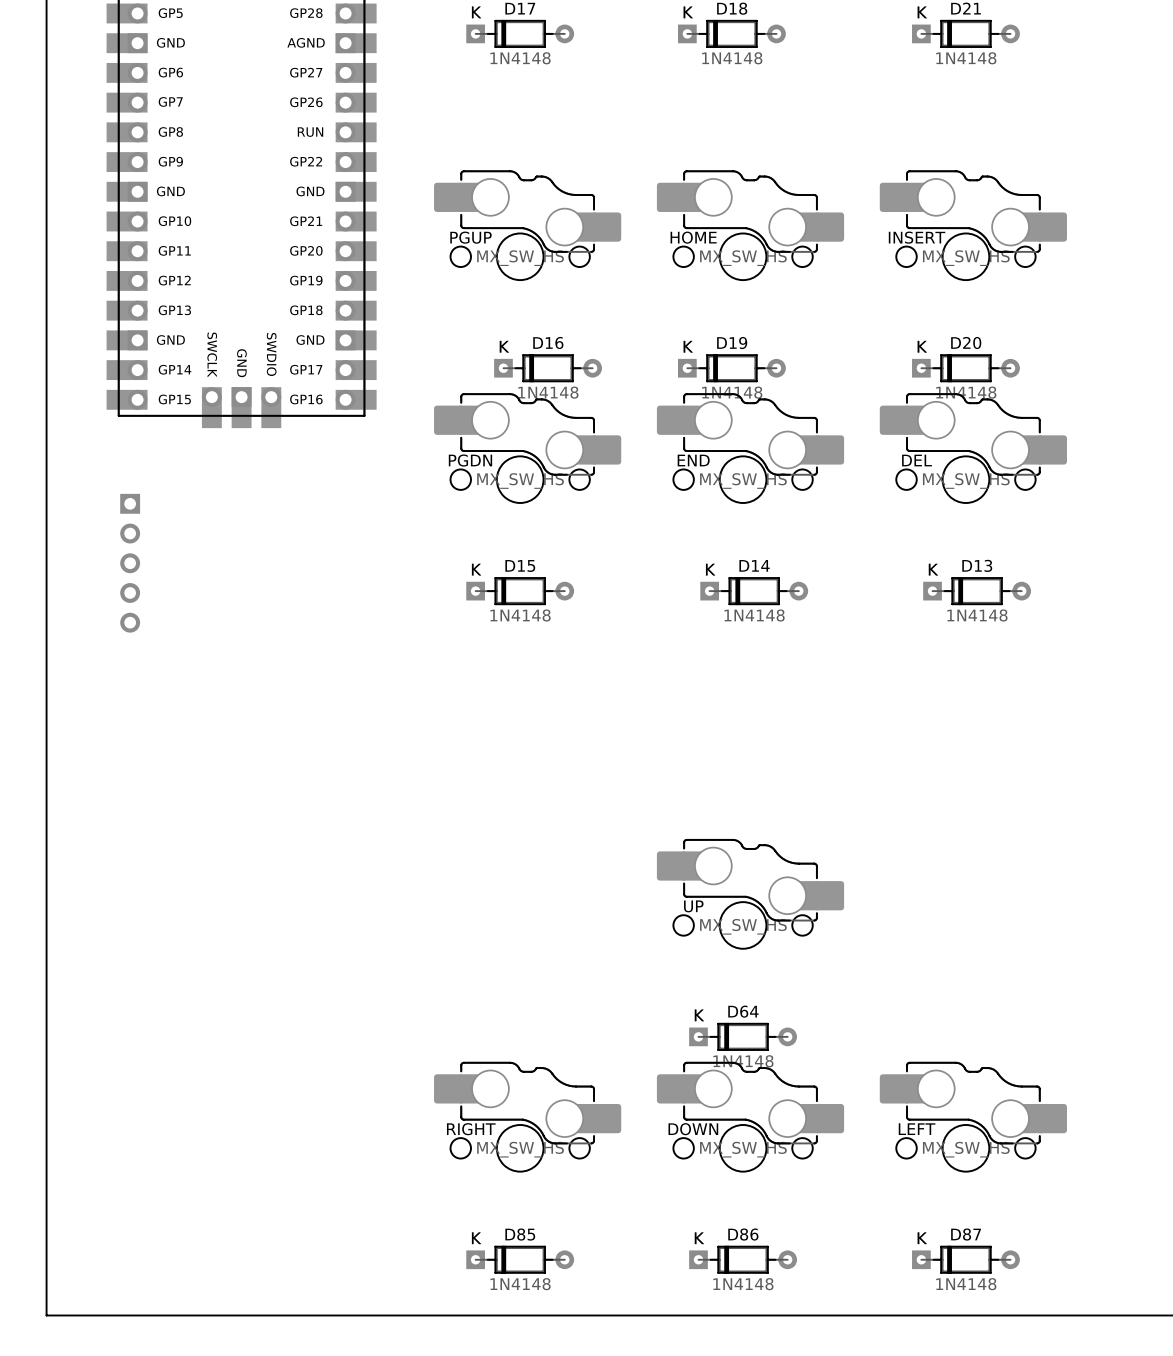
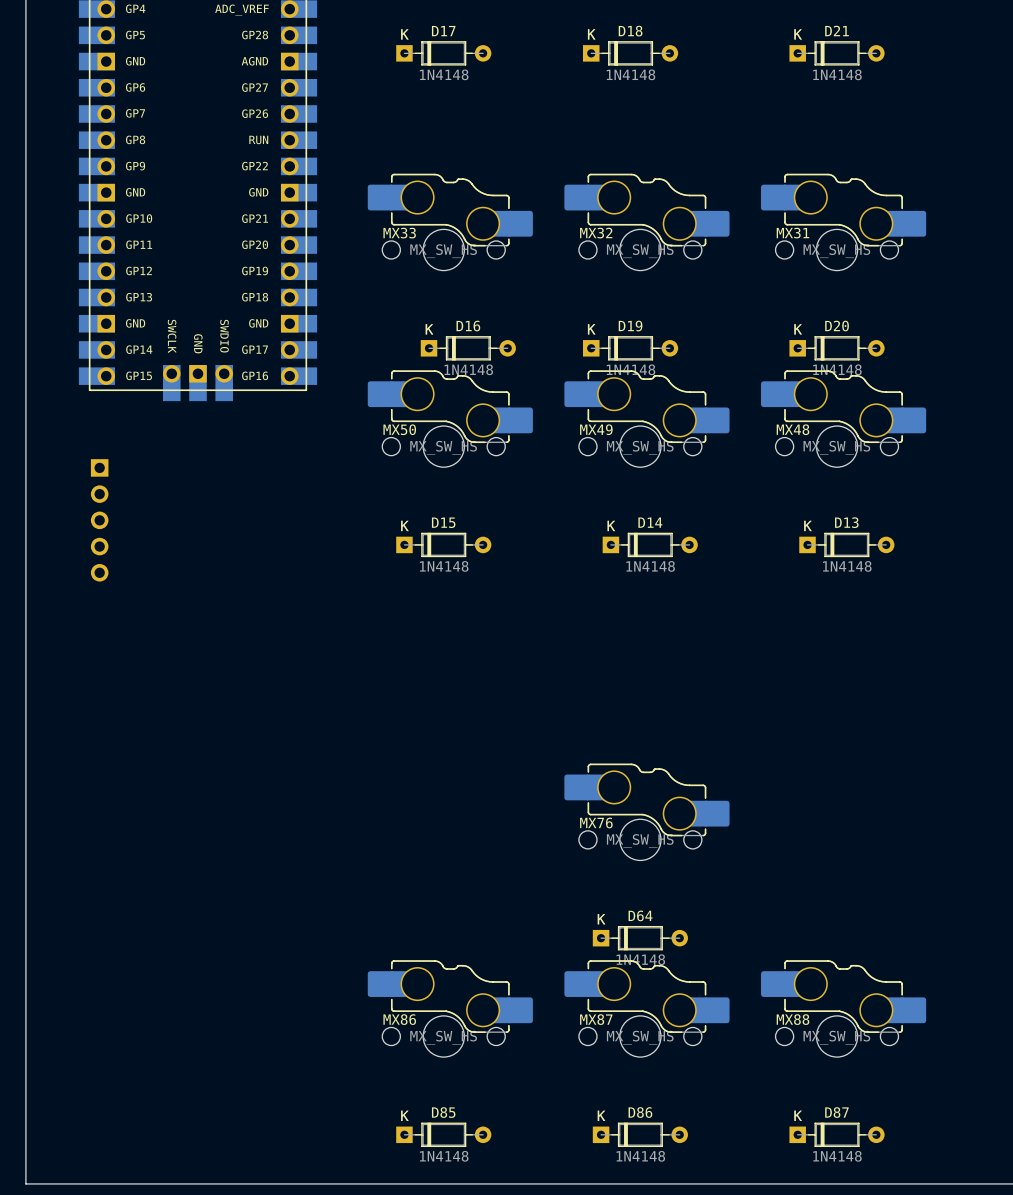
PGUP name: PGUP (470, 237) -> MX33 (399, 233)
HOME name: HOME (693, 237) -> MX32 (596, 233)
INSERT name: INSERT (917, 237) -> MX31 (792, 233)
PGDN name: PGDN (470, 460) -> MX50 (399, 429)
END name: END (693, 460) -> MX49 (596, 429)
DEL name: DEL (916, 460) -> MX48 (793, 429)
UP name: UP (693, 906) -> MX76 (596, 822)
RIGHT name: RIGHT (471, 1129) -> MX86 (399, 1019)
DOWN name: DOWN (693, 1129) -> MX87 (596, 1019)
LEFT name: LEFT (917, 1129) -> MX88 (793, 1019)

